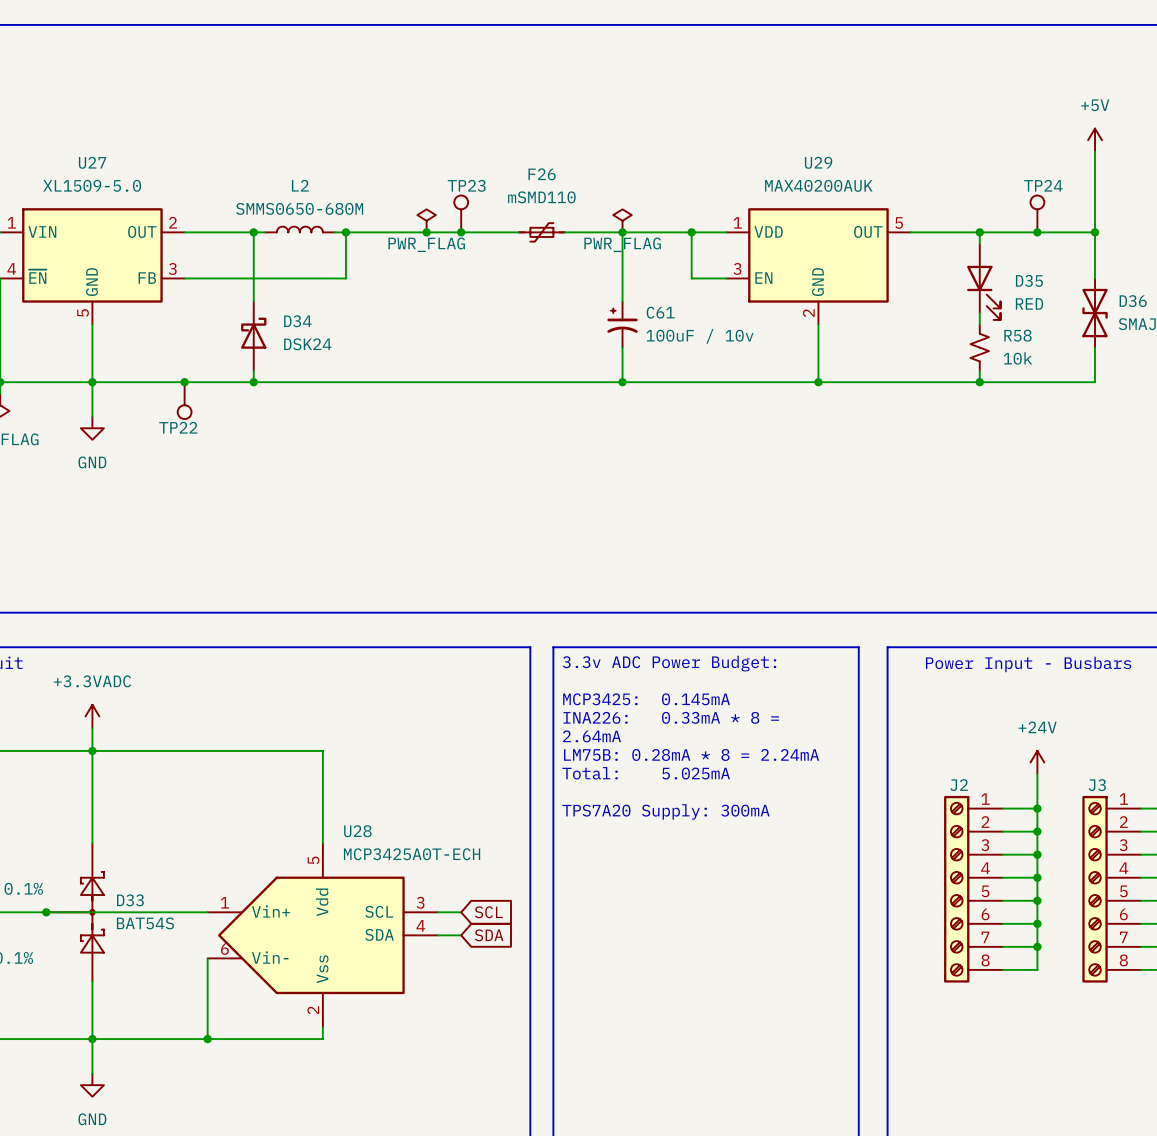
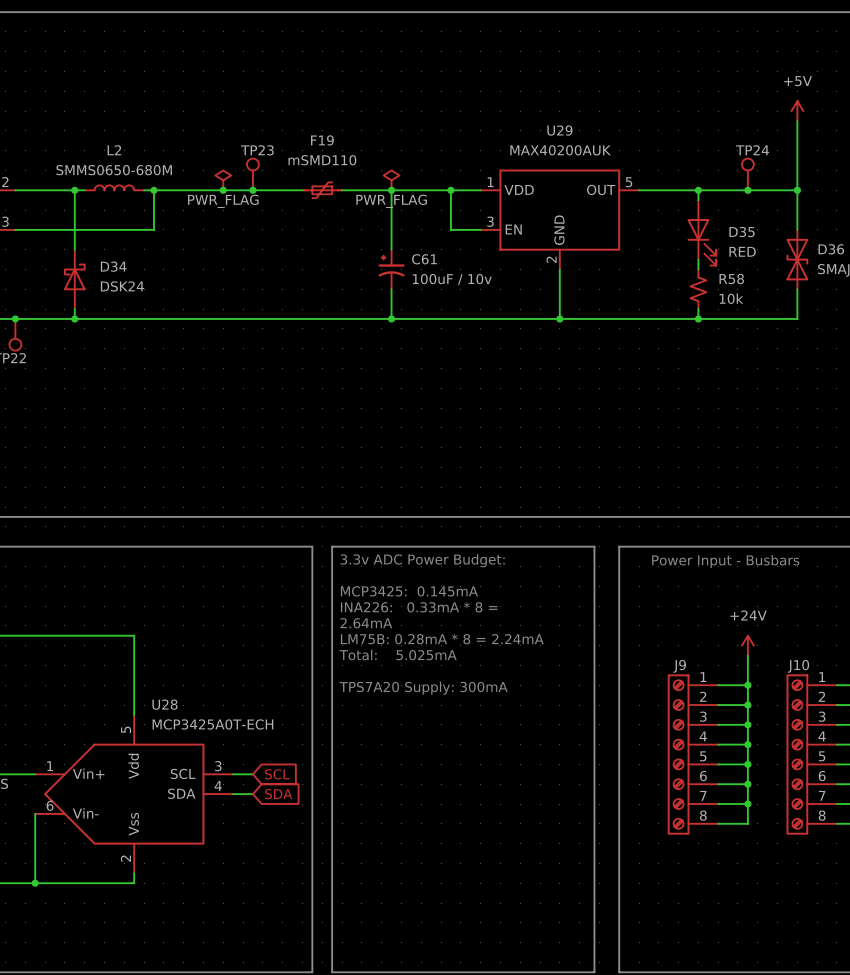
F26 name: F26 (542, 174) -> F19 (322, 140)
J2 name: J2 (959, 785) -> J9 (679, 666)
J3 name: J3 (1097, 785) -> J10 (798, 666)

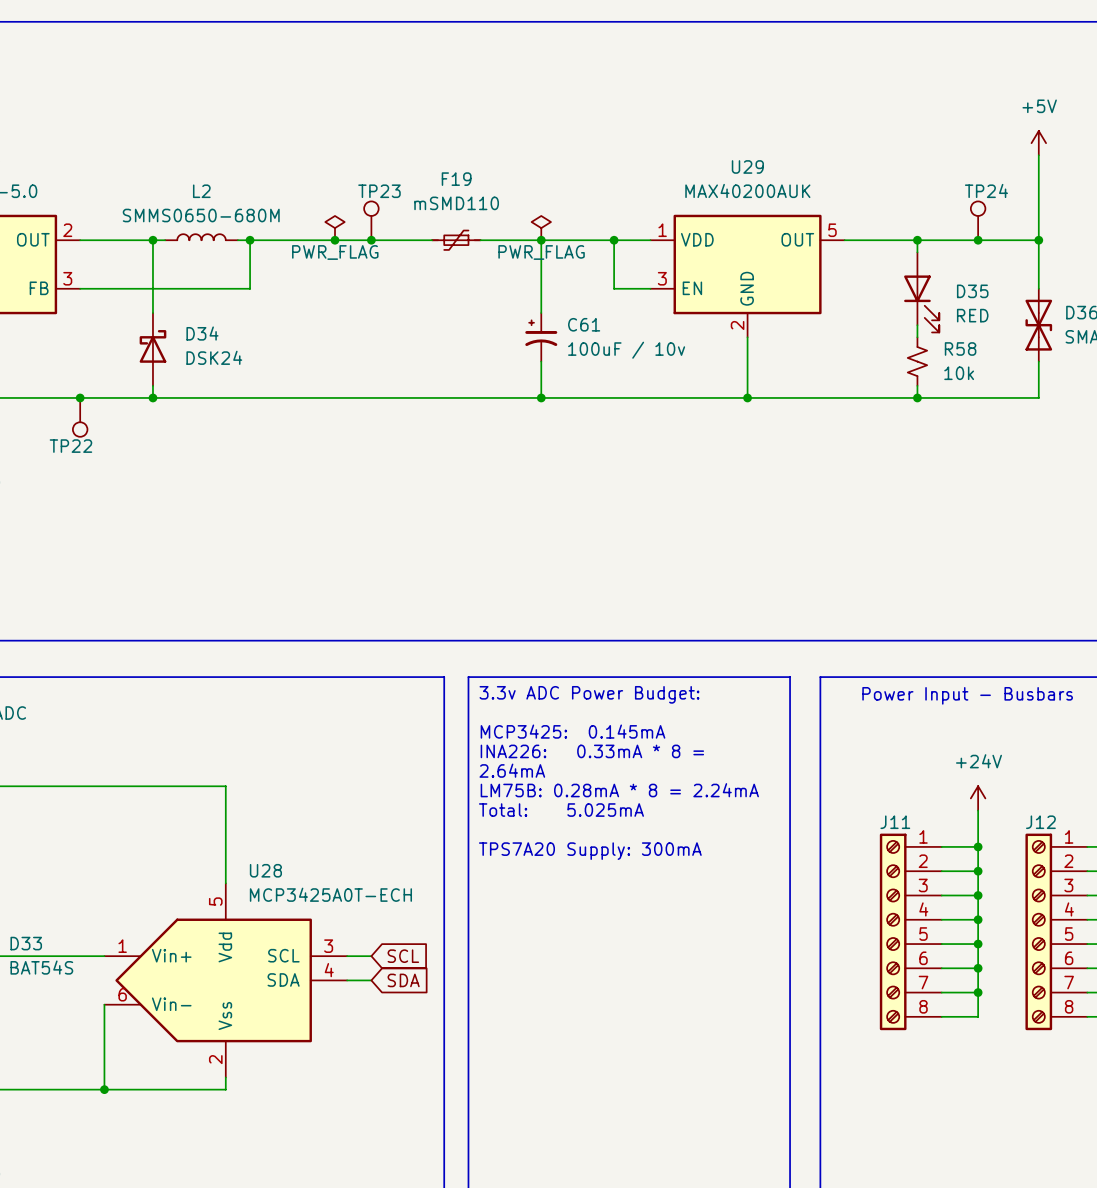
J9 name: J9 (679, 666) -> J11 (895, 822)
J10 name: J10 (798, 666) -> J12 (1040, 822)

